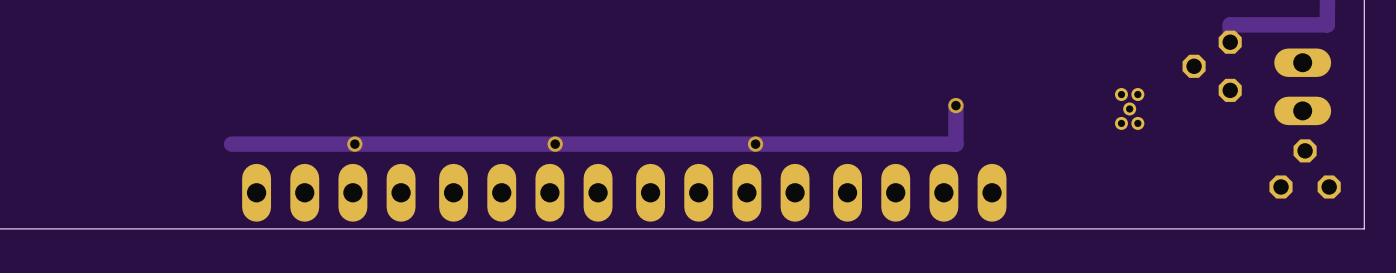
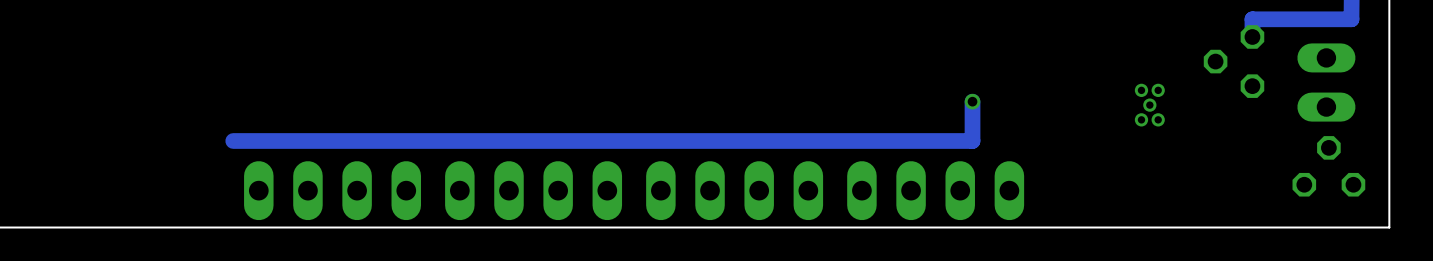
via: (354, 144) -> none
via: (555, 144) -> none
via: (755, 144) -> none

